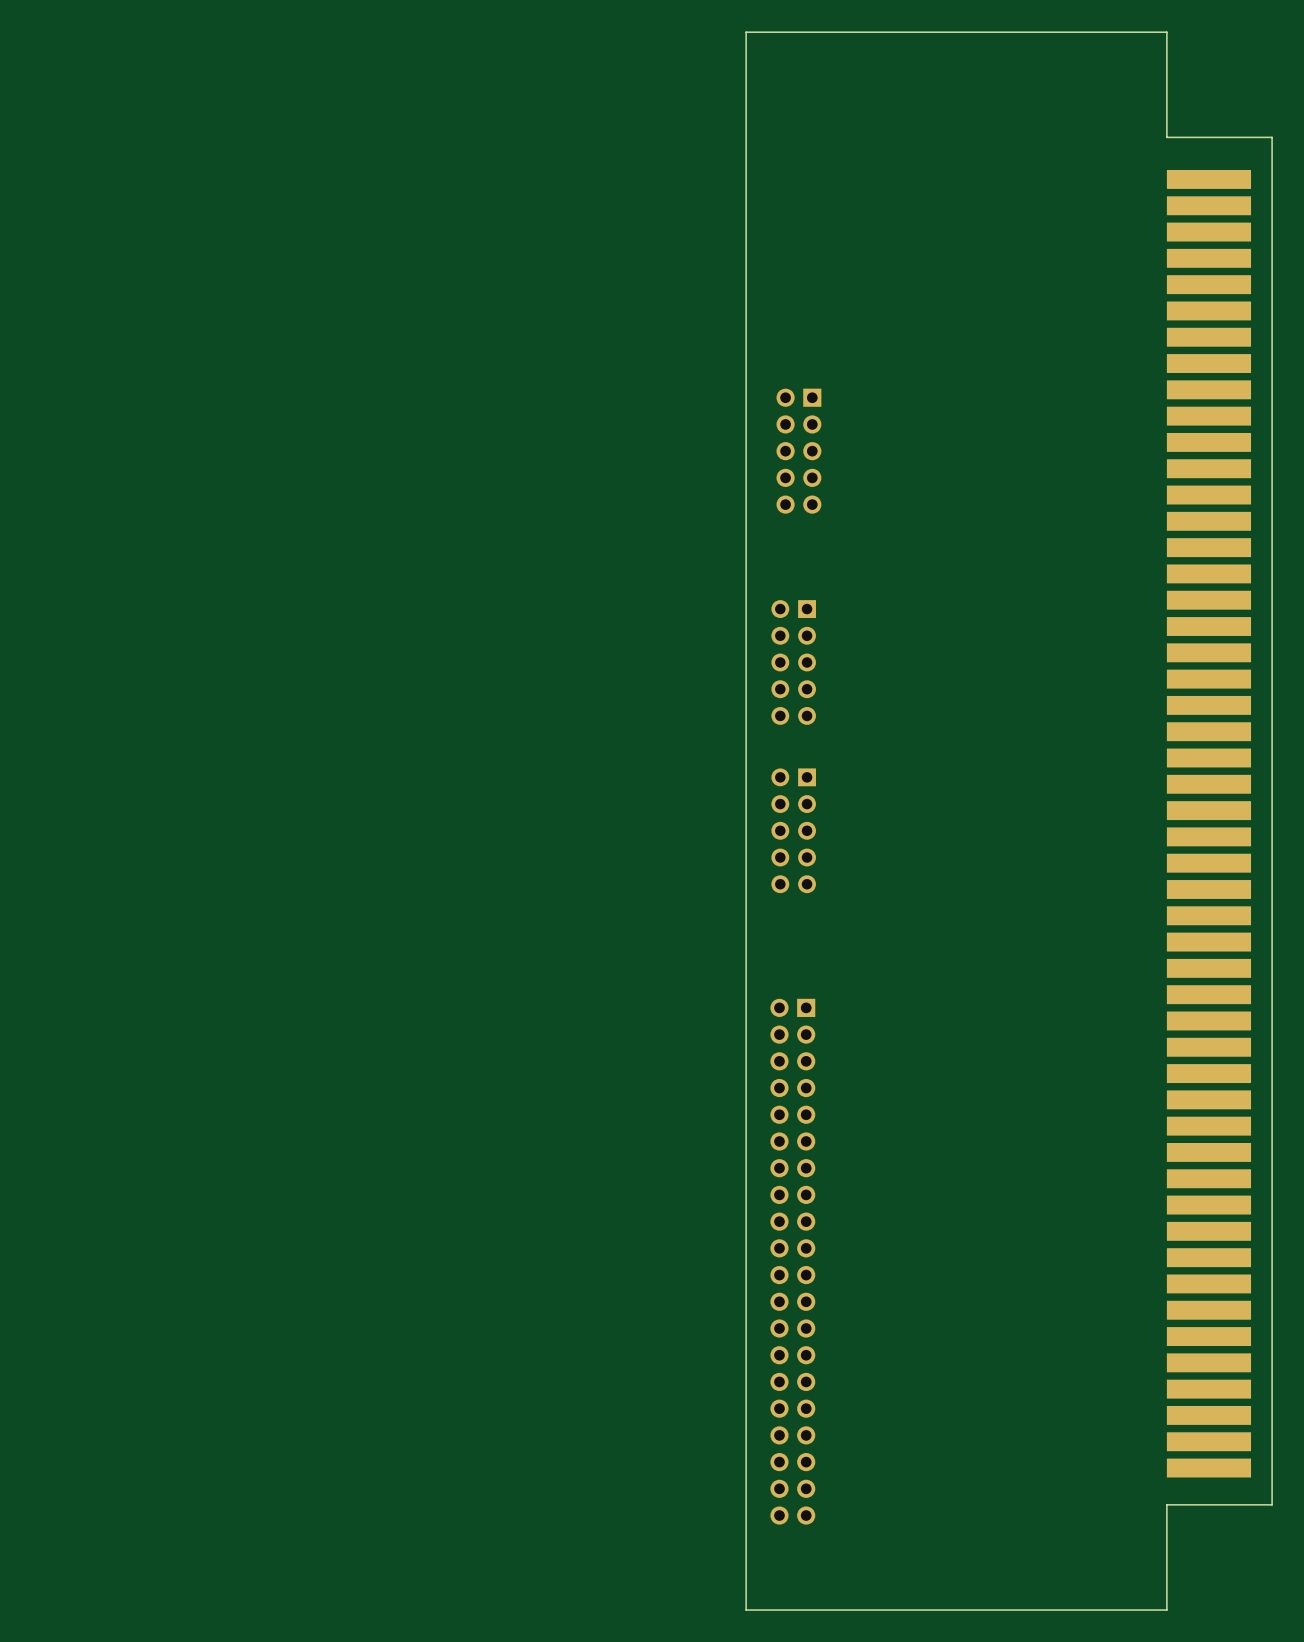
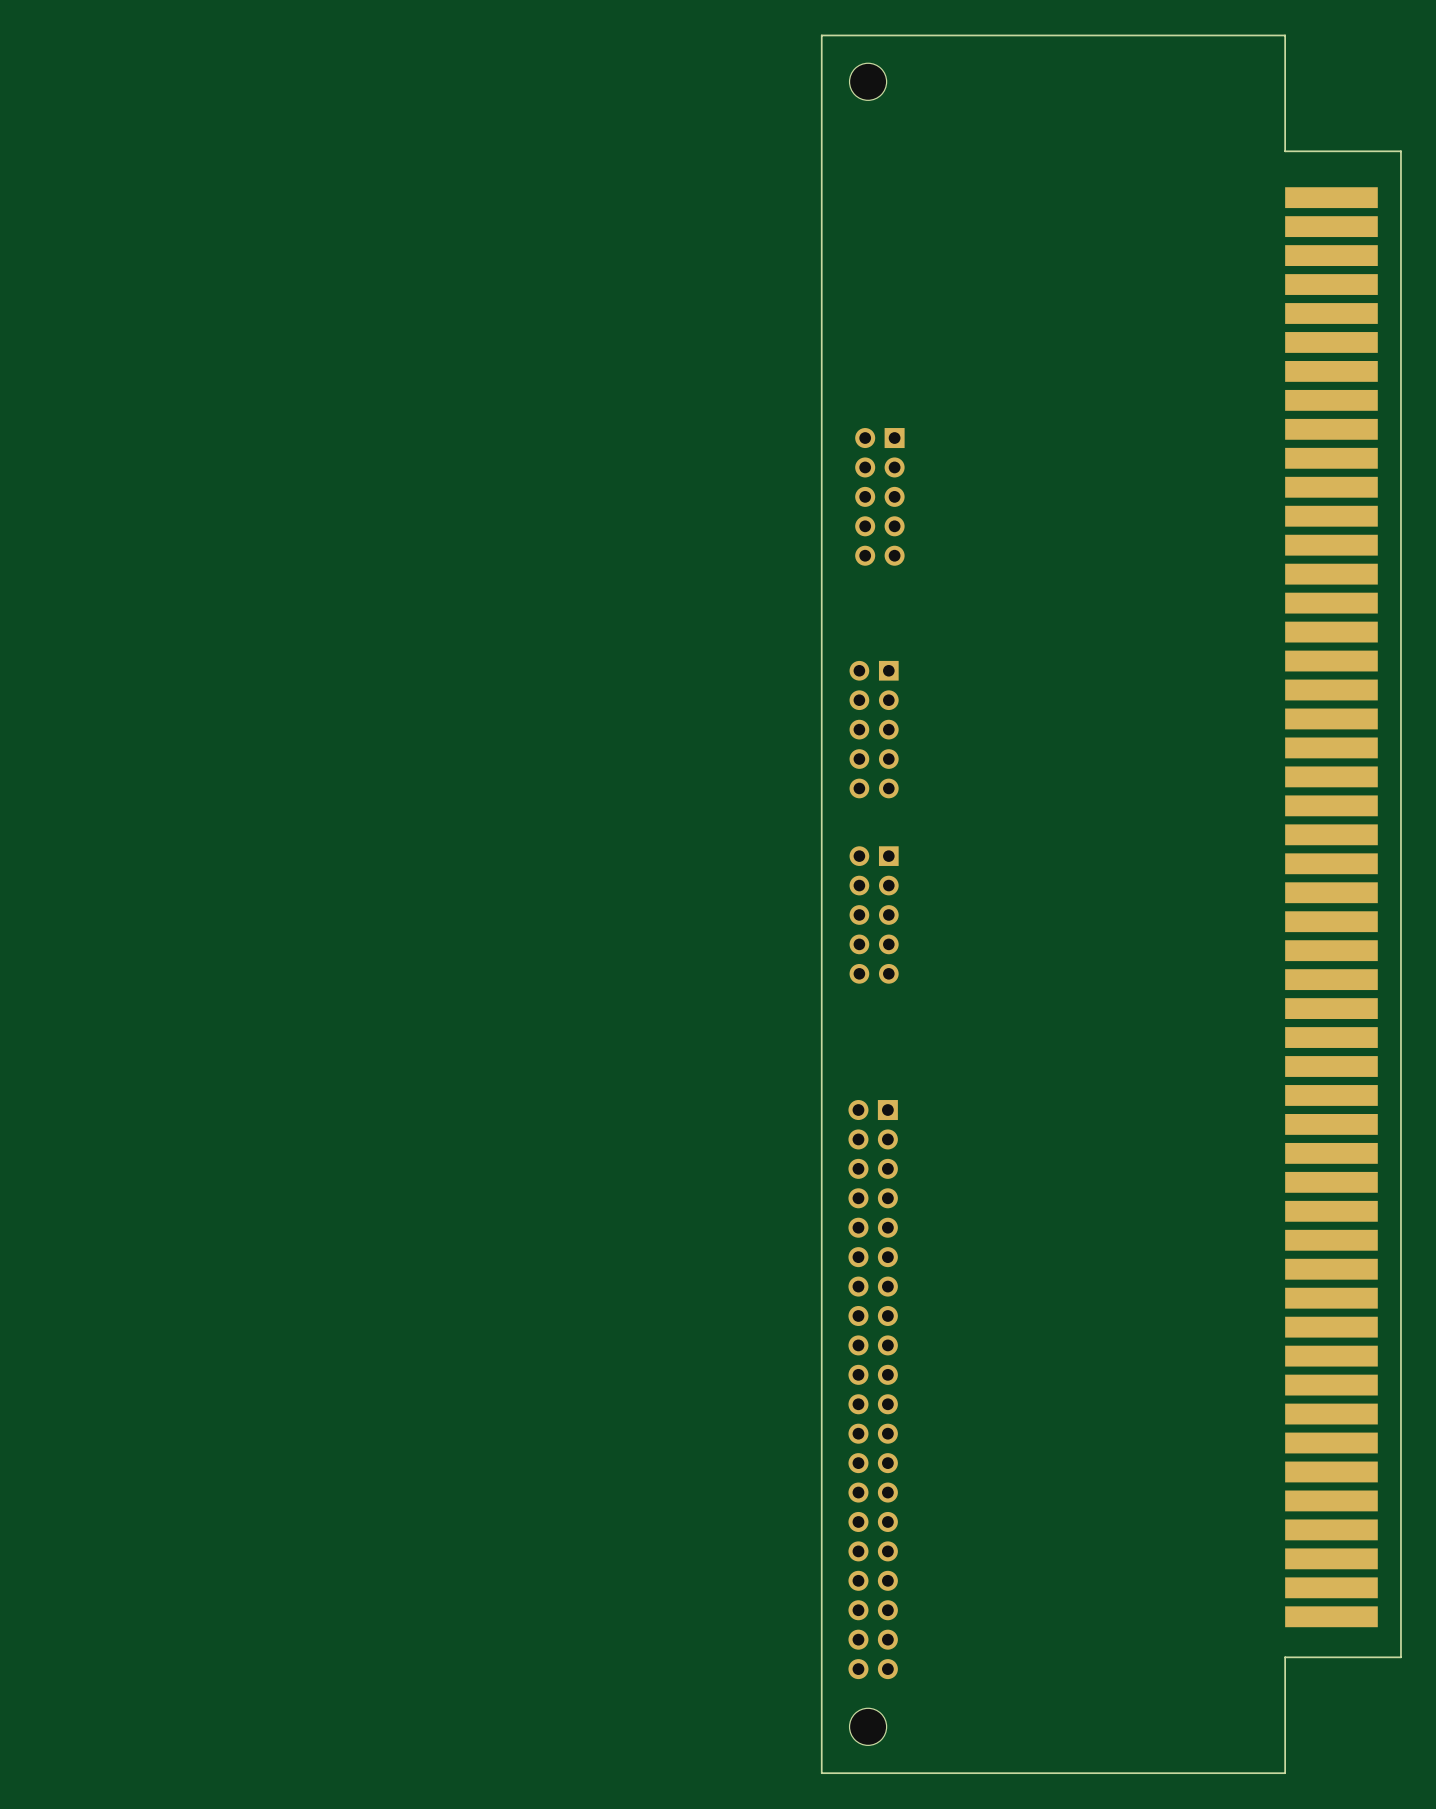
part: none -> (868, 81)
part: none -> (868, 1726)

